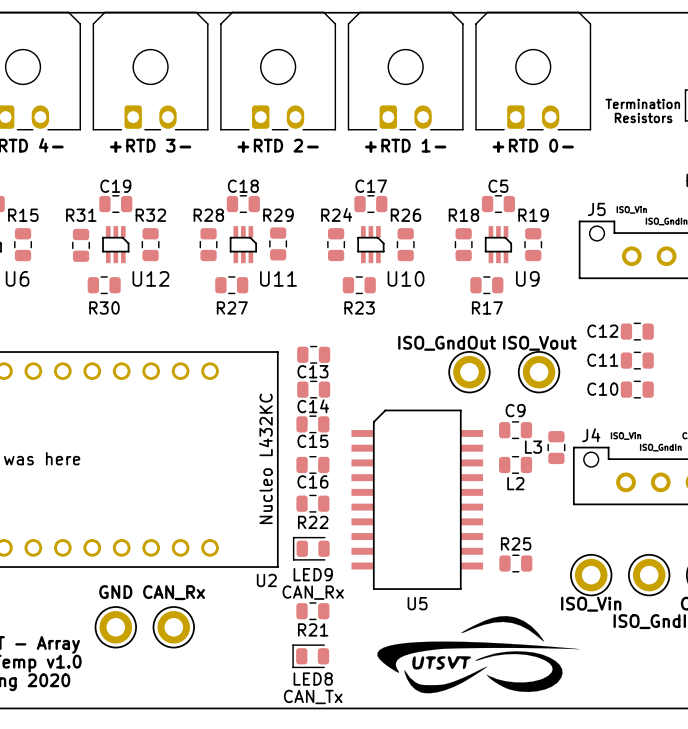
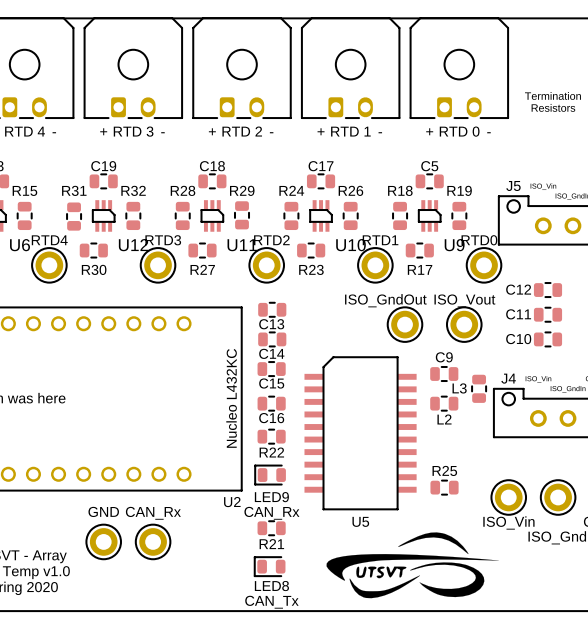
text: none -> RTD4 (49, 240)
text: none -> RTD3 (163, 240)
text: none -> RTD2 (271, 240)
text: none -> RTD1 (380, 240)
part: none -> (49, 265)
part: none -> (158, 265)
part: none -> (266, 265)
part: none -> (375, 265)
RTD0: none -> (484, 265)

